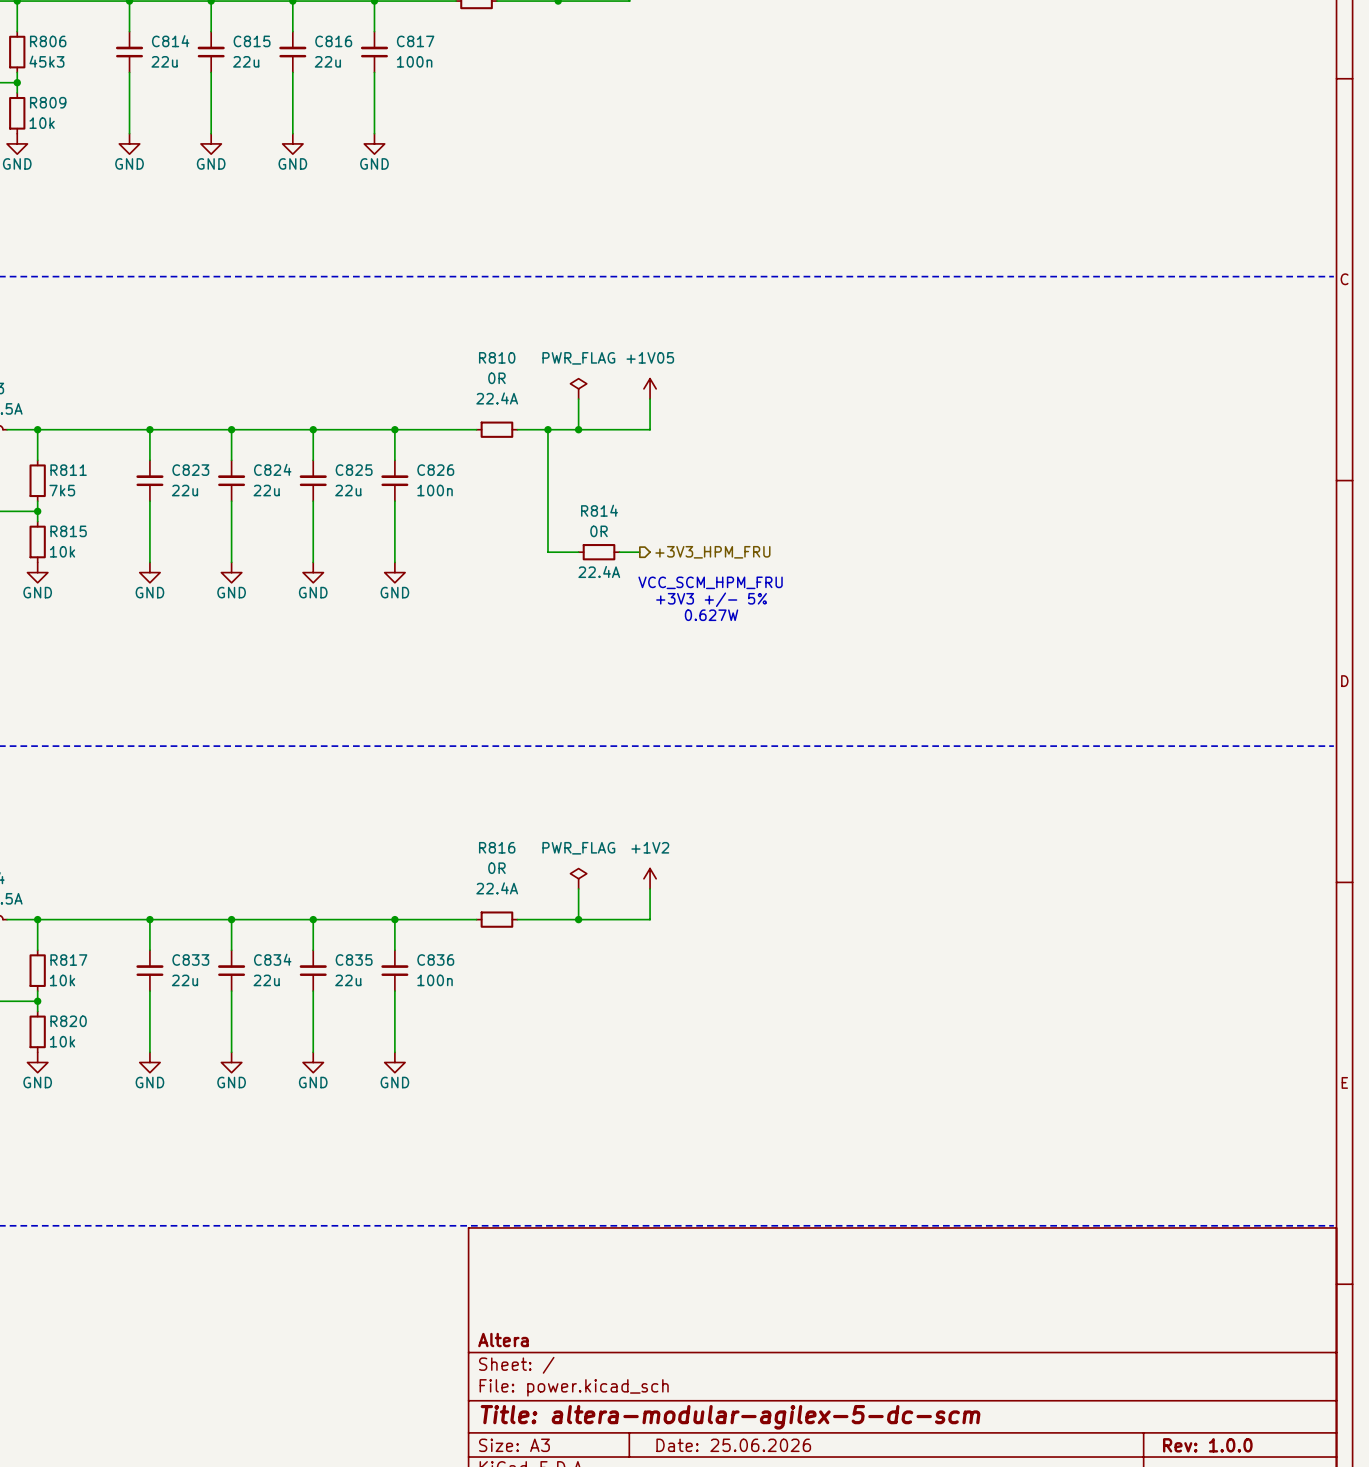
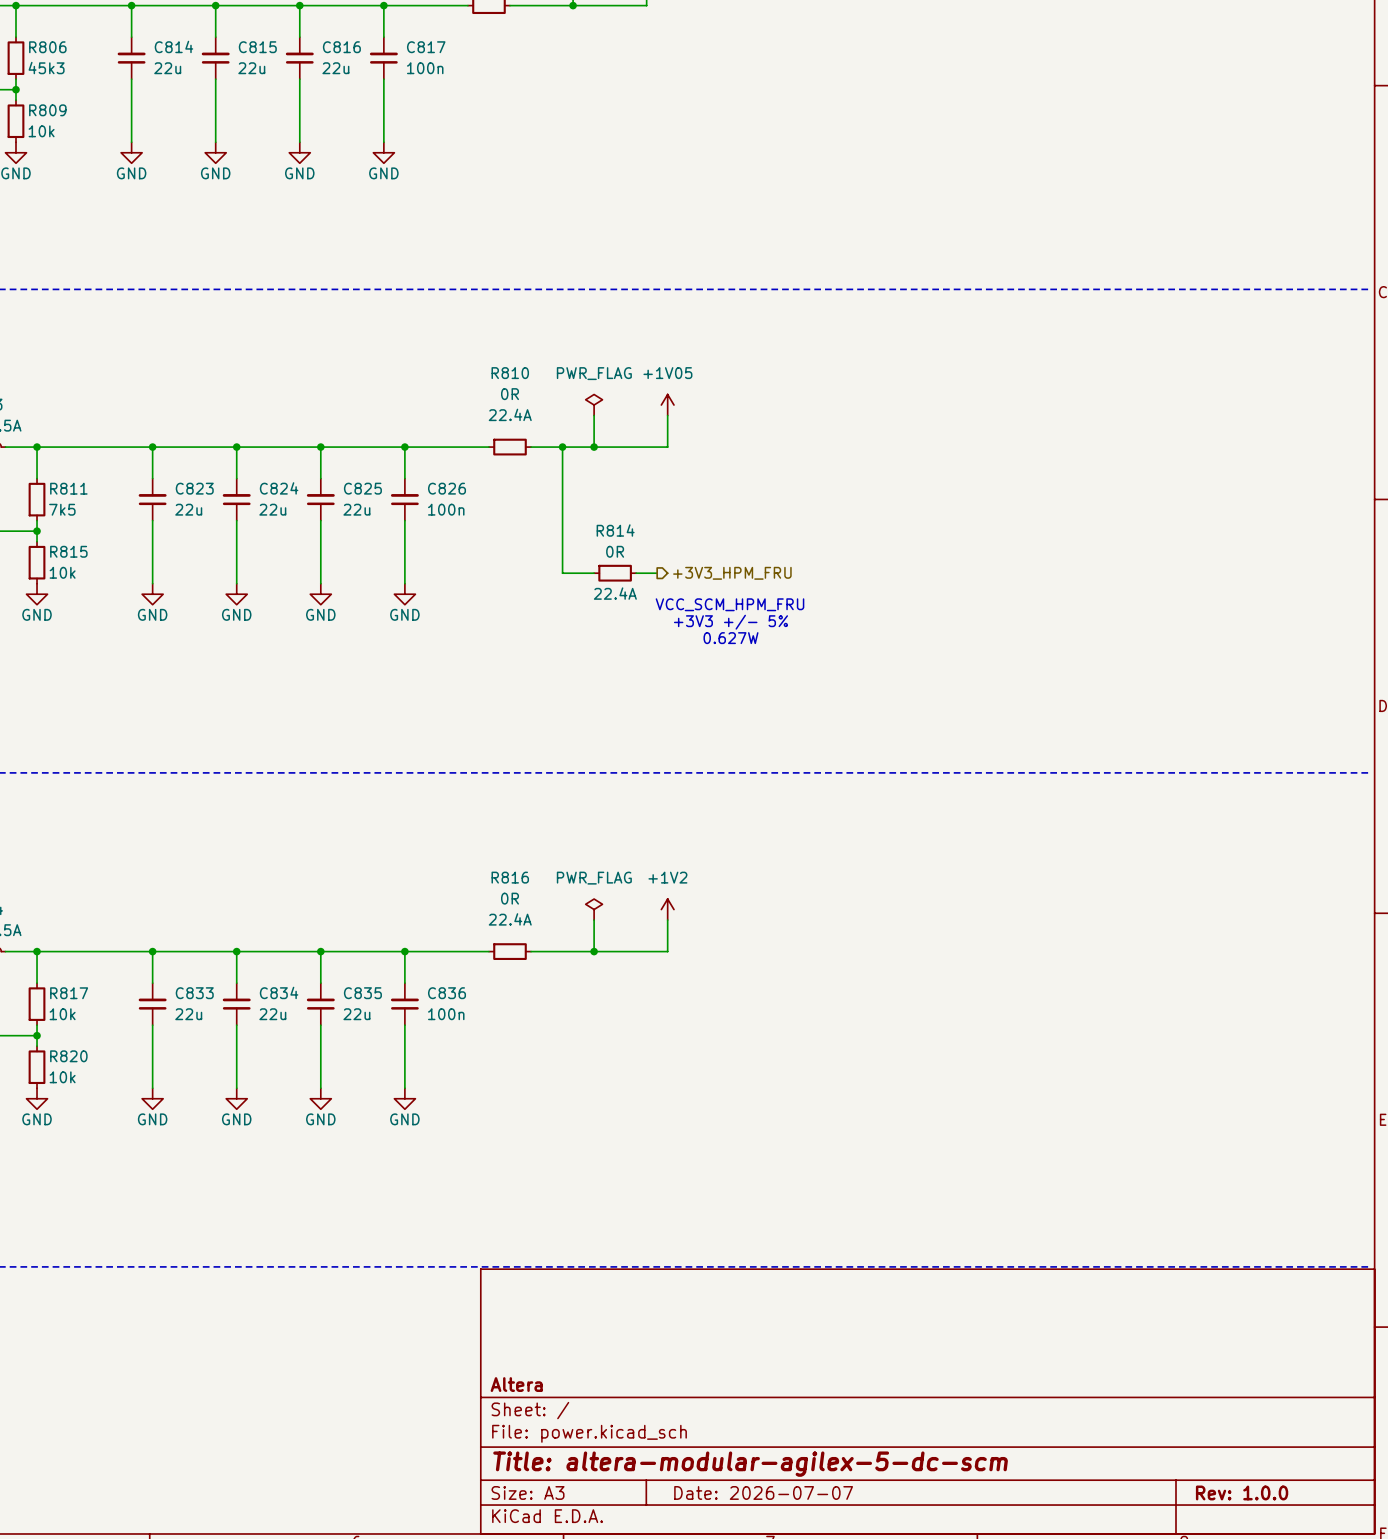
title block: Date: 25.06.2026 (733, 1445) -> Date: 2026-07-07 (763, 1492)

